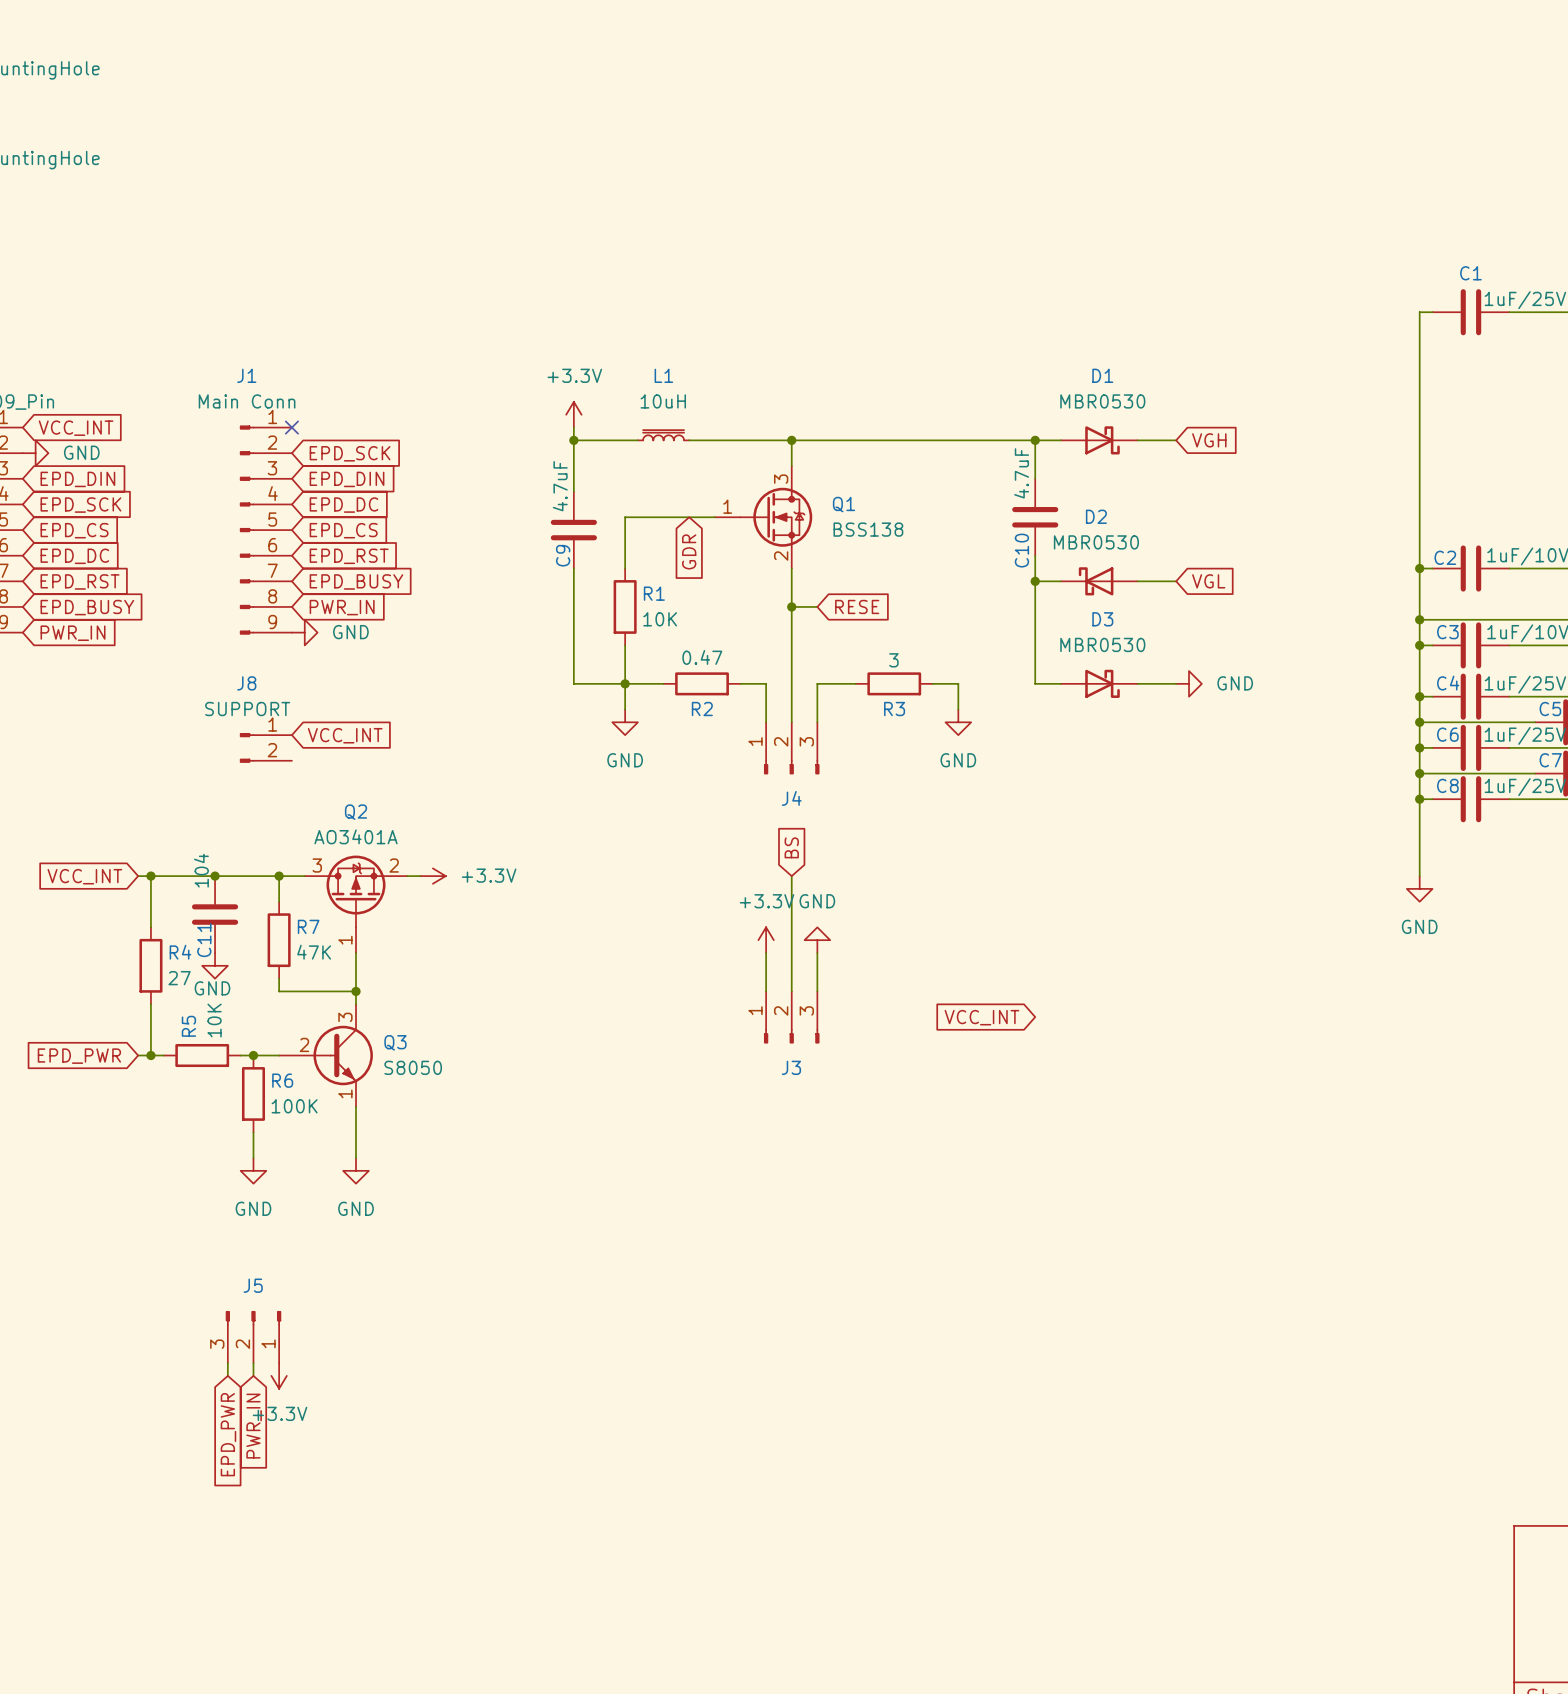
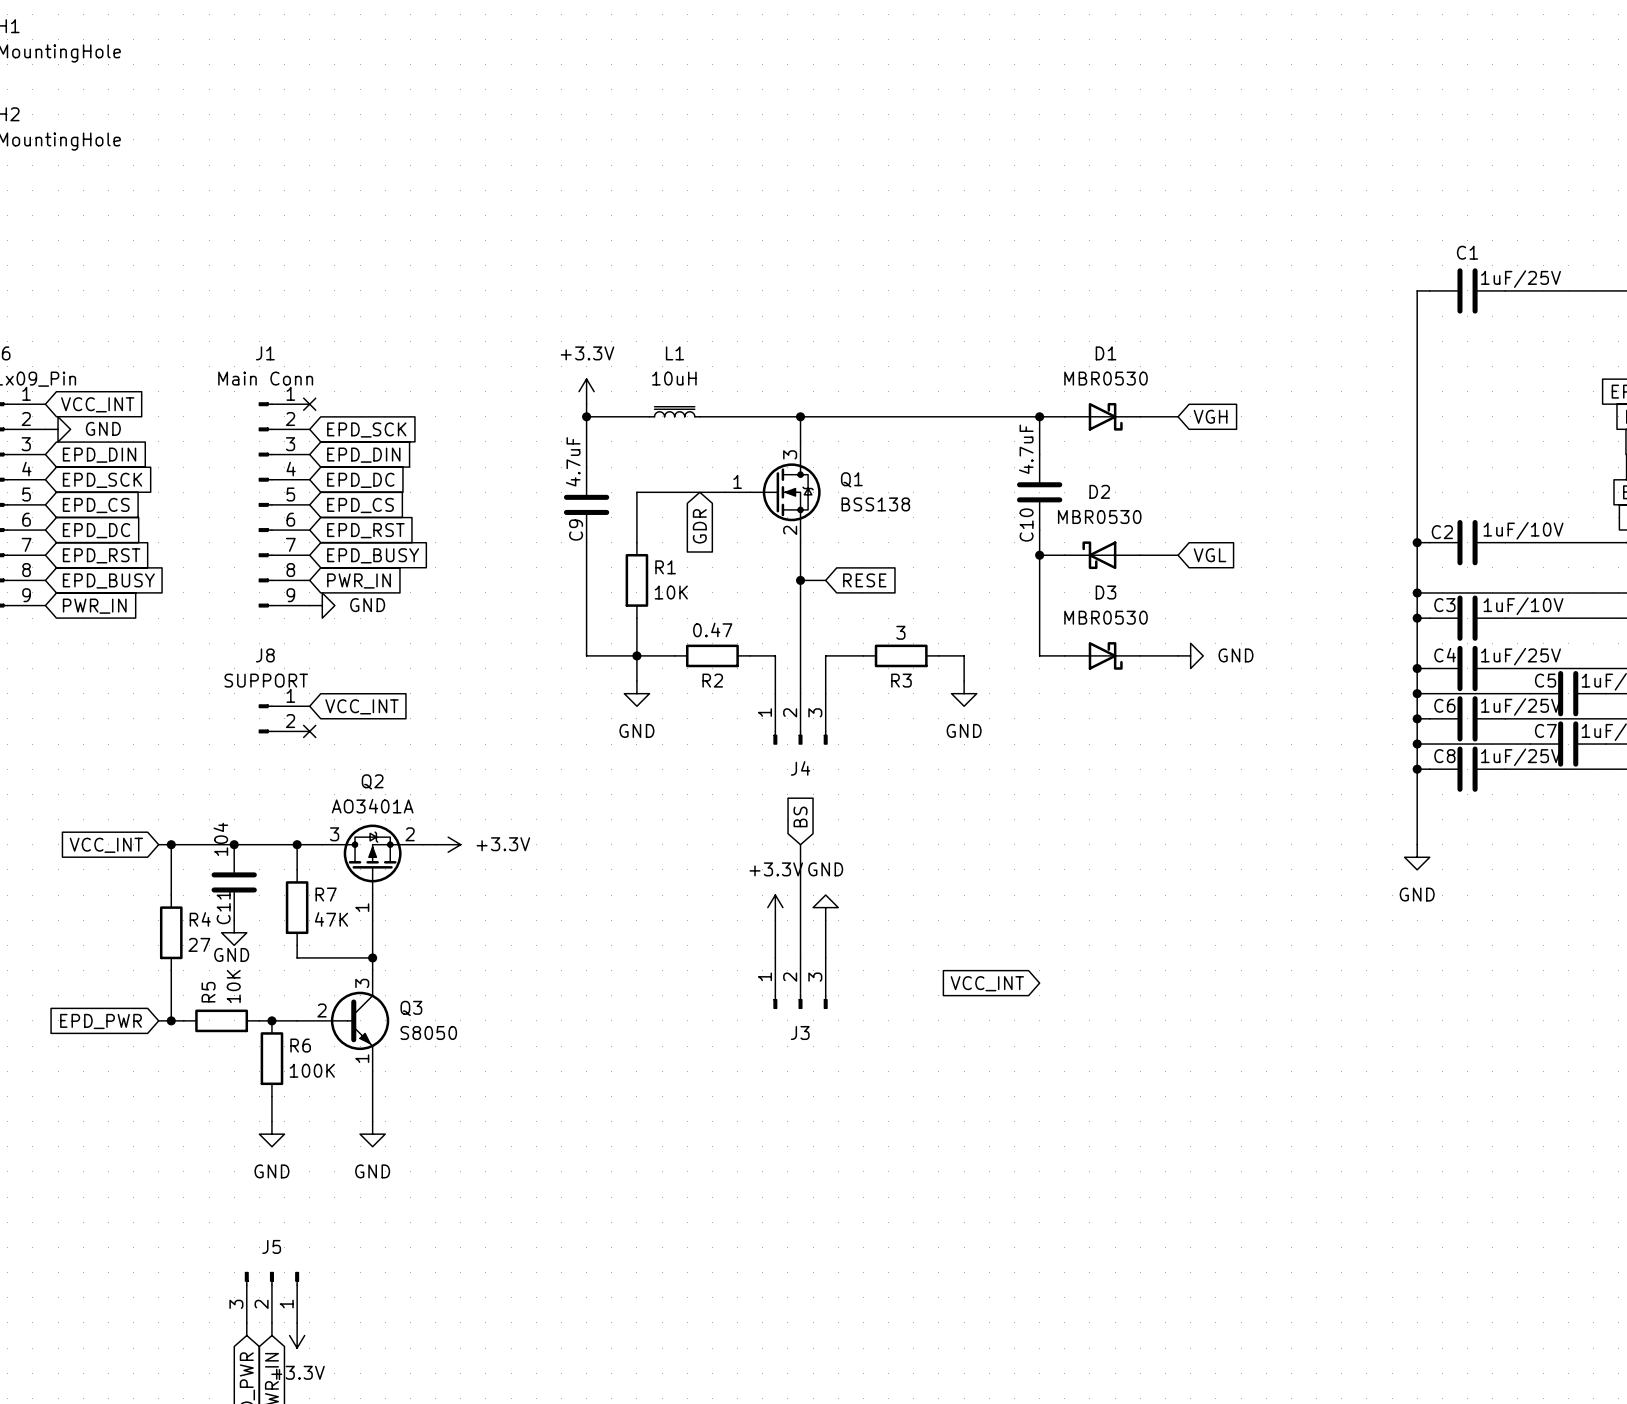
no-connect mark: none -> (309, 731)

